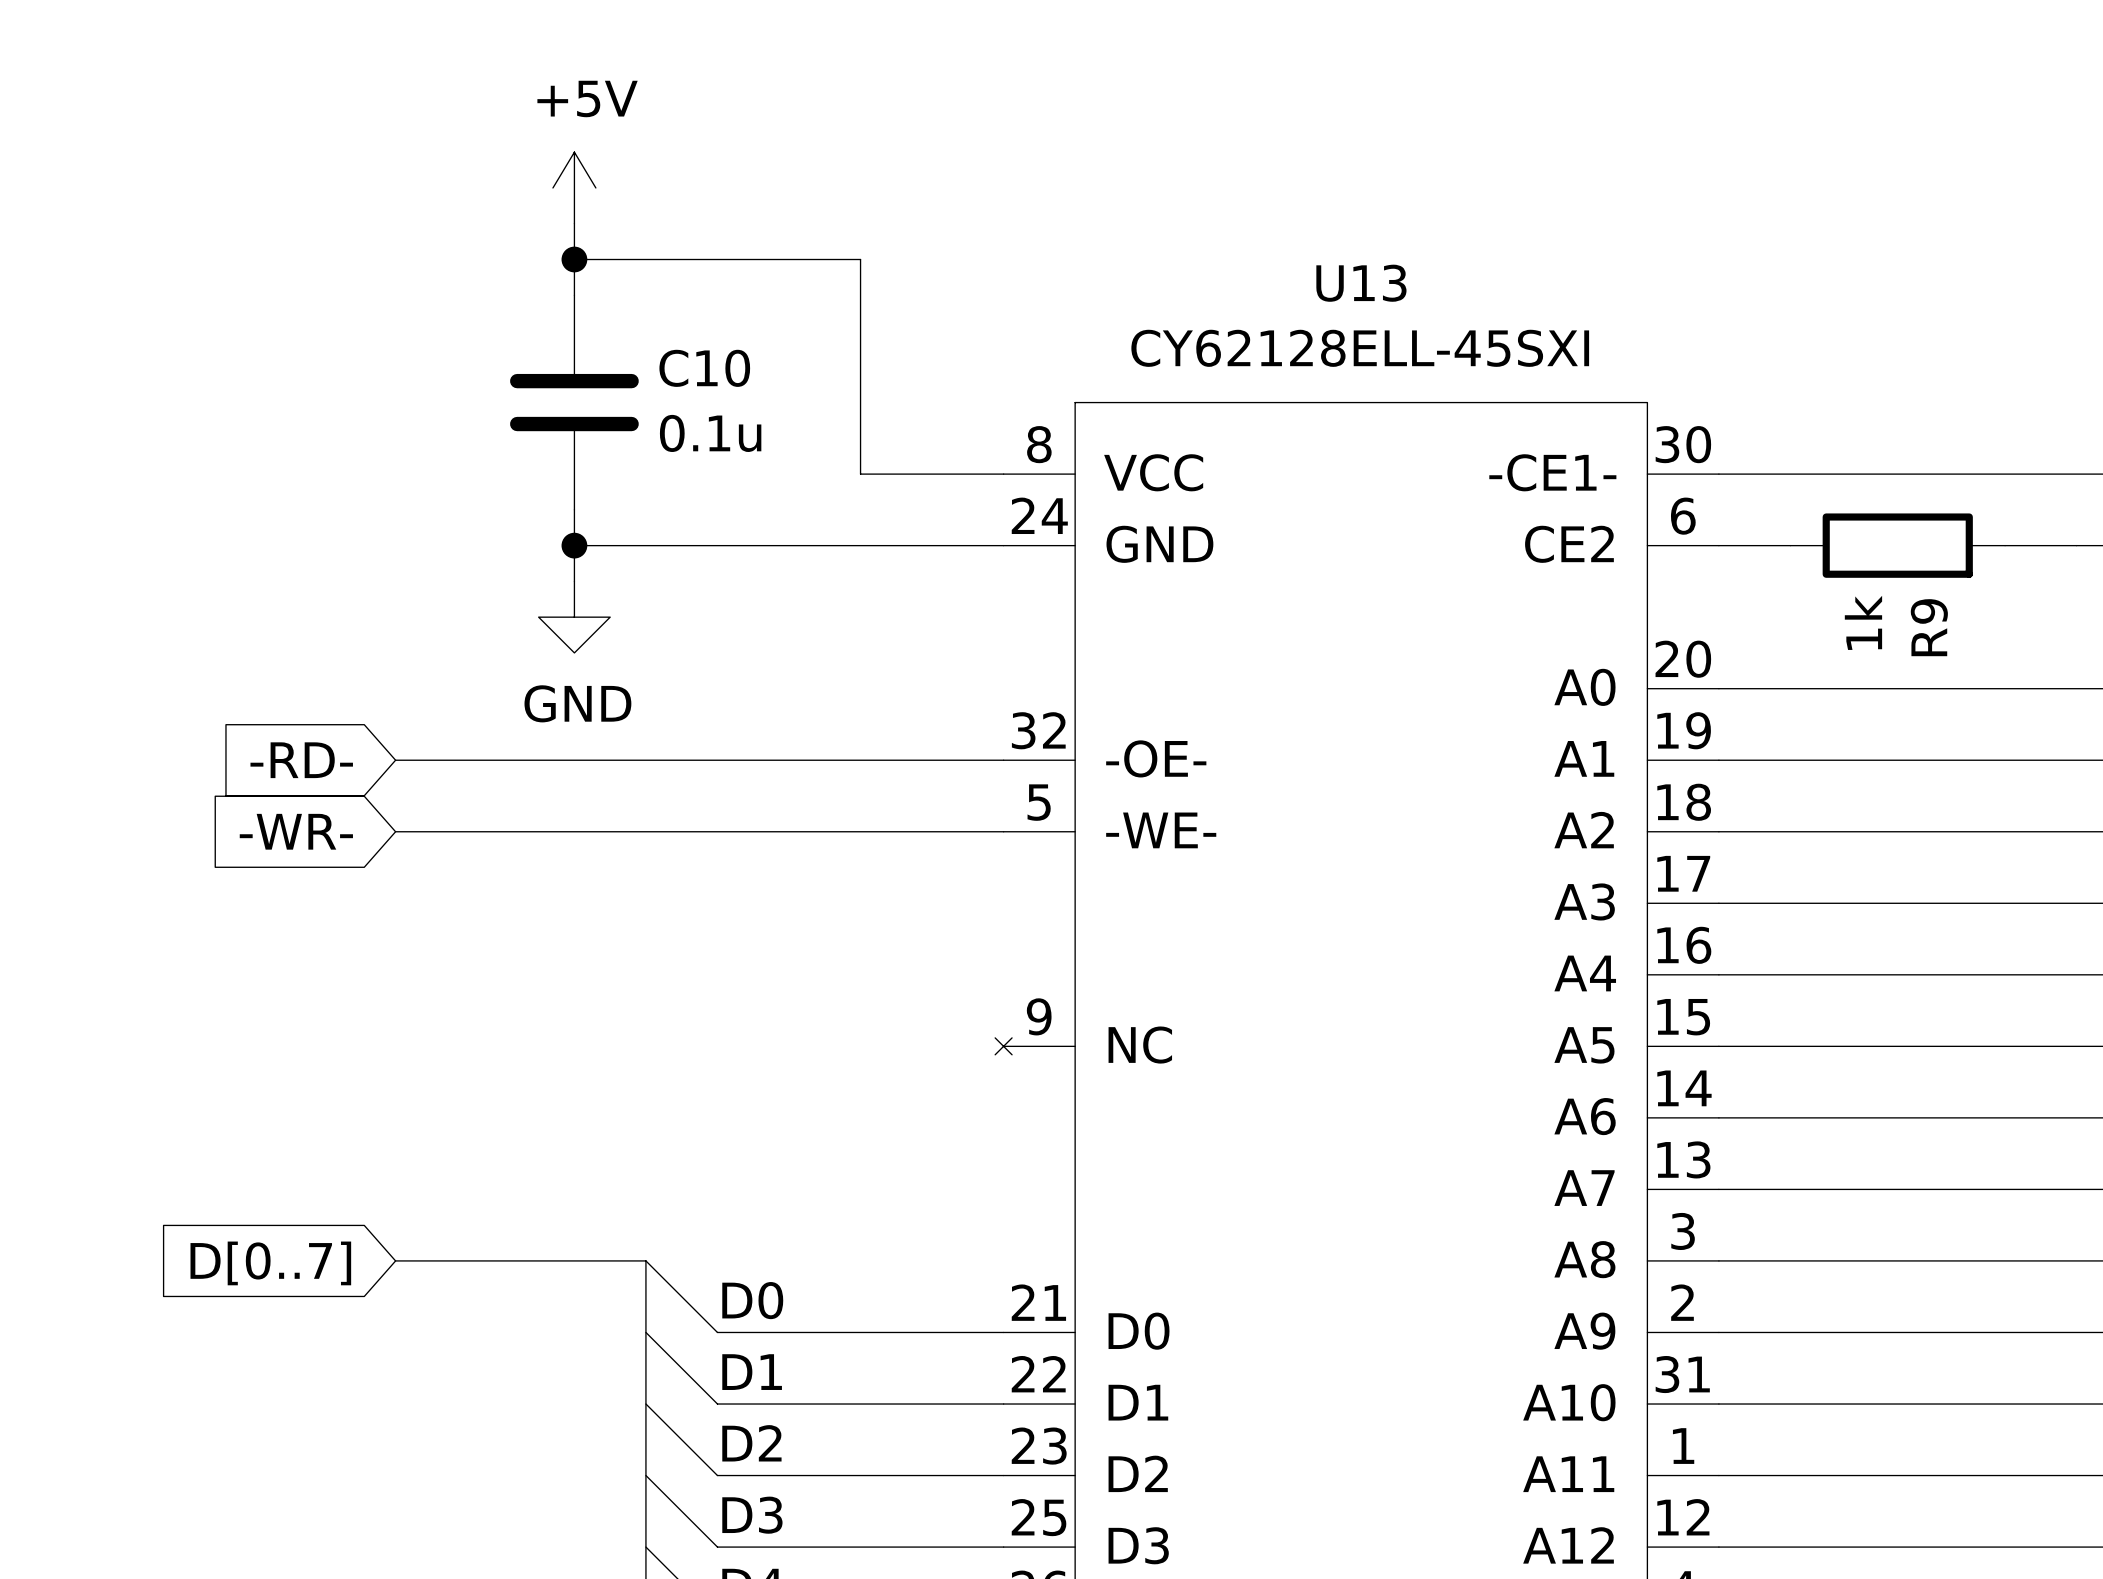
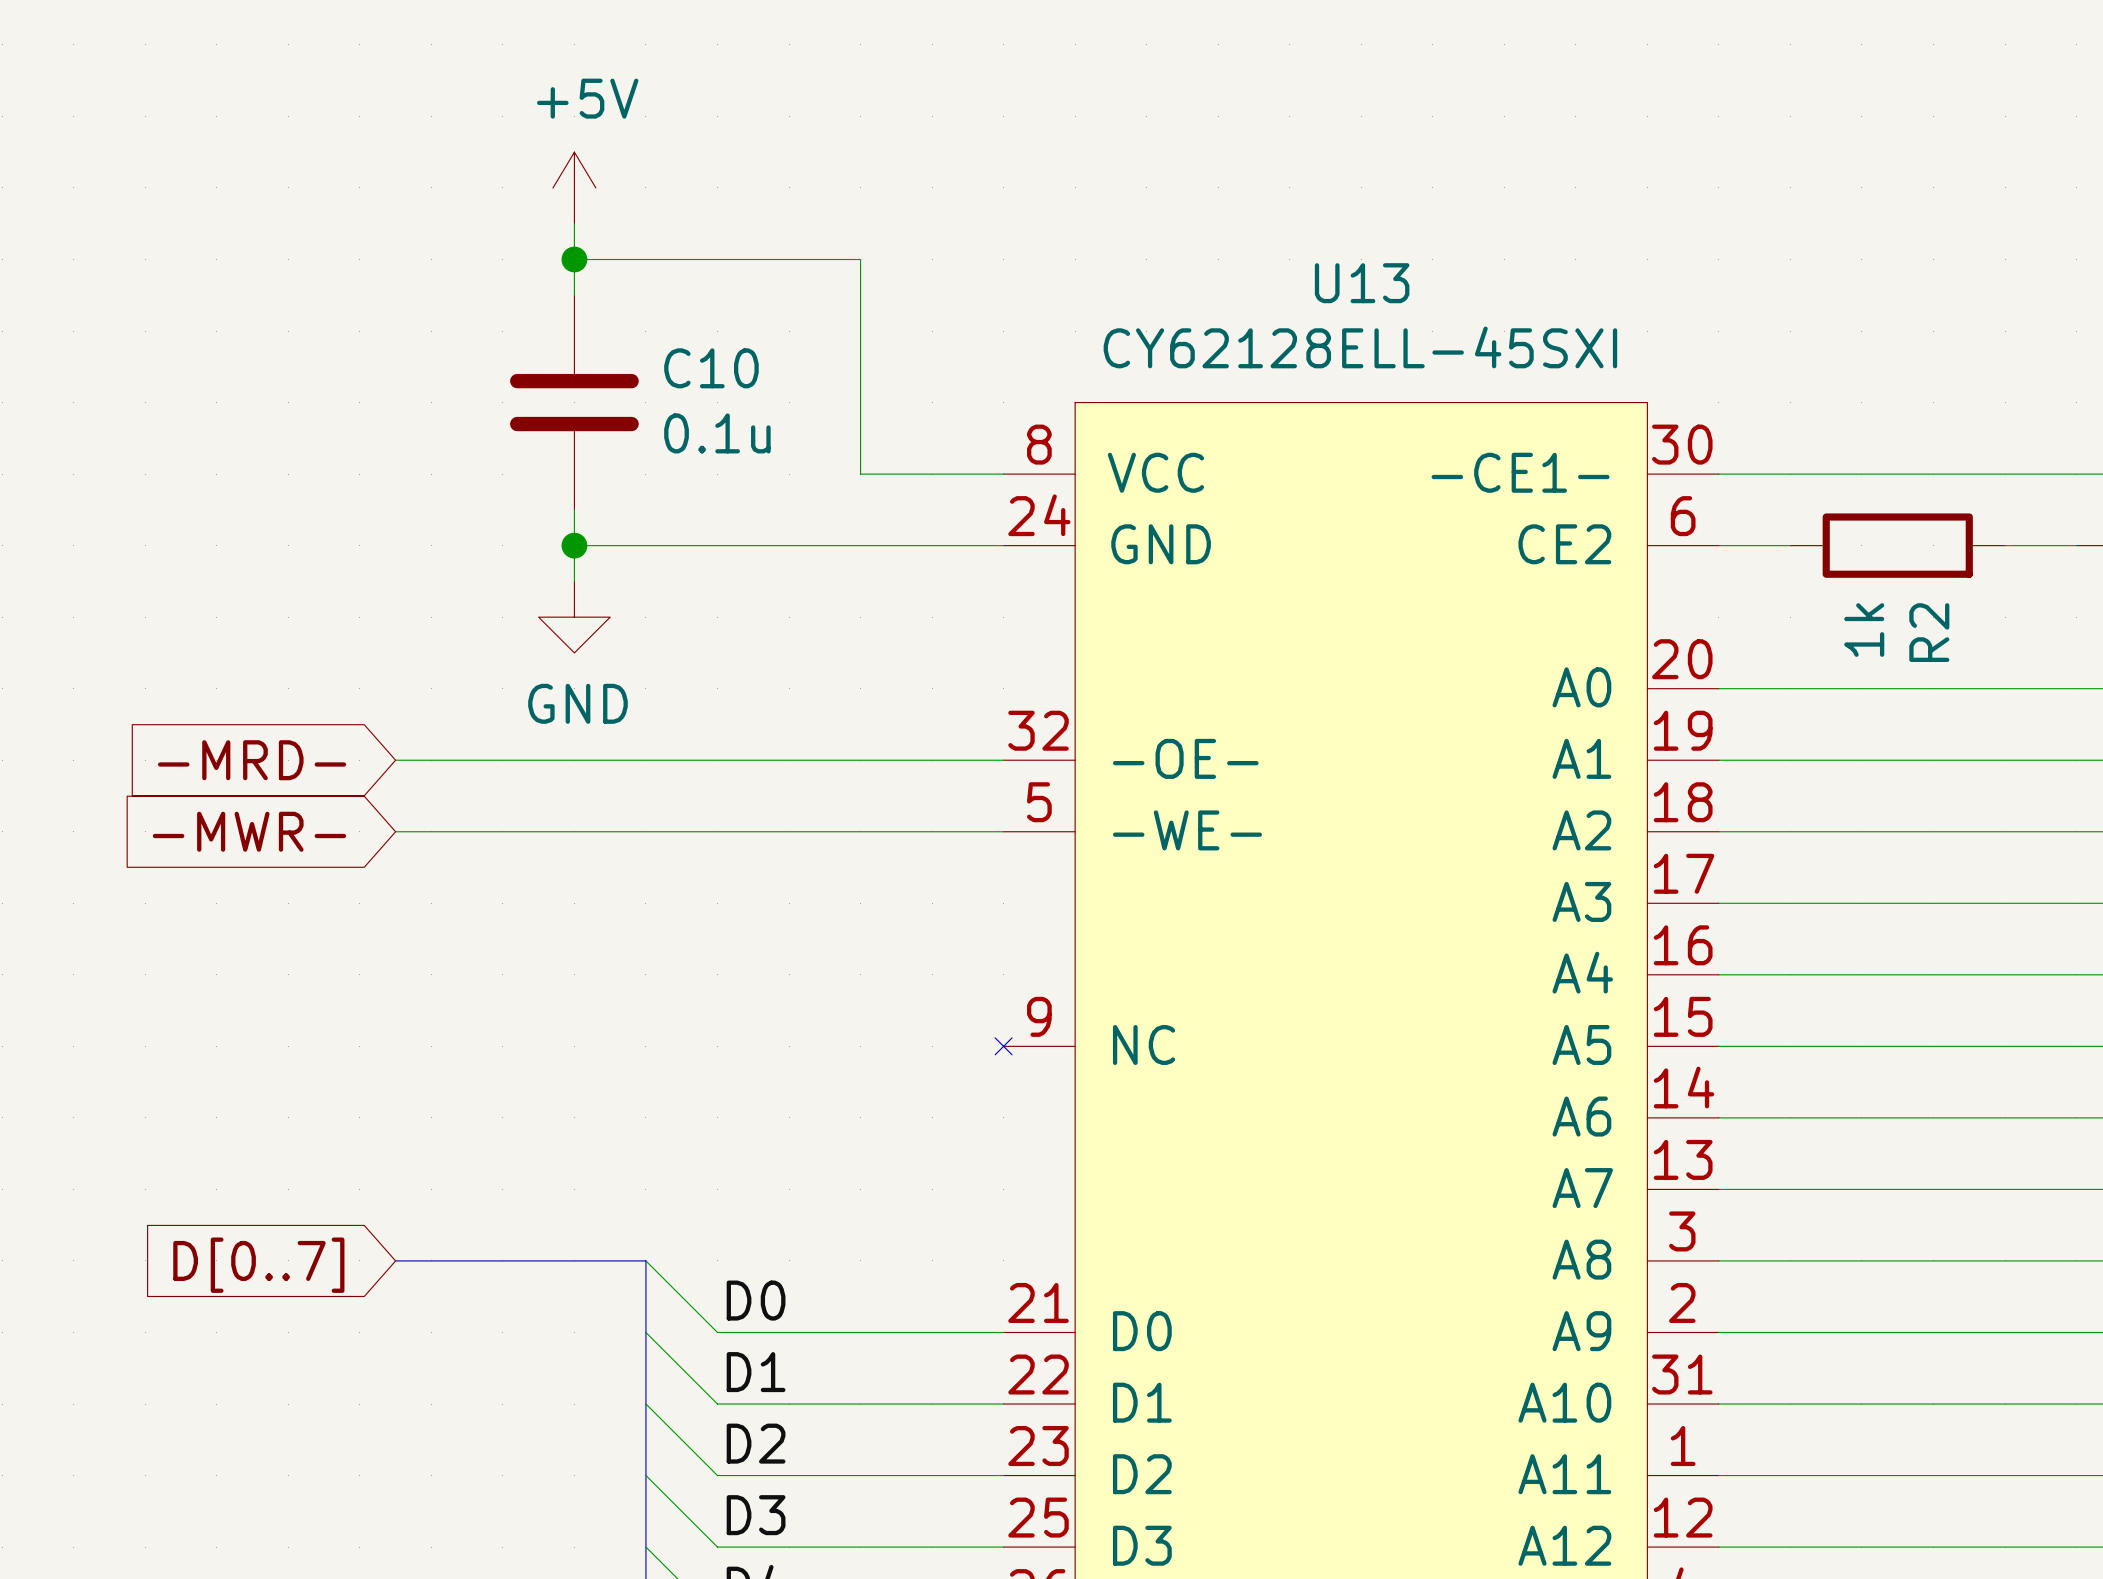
R9 name: R9 (1929, 627) -> R2 (1929, 632)
global label: -RD- (301, 760) -> -MRD- (252, 760)
global label: -WR- (296, 831) -> -MWR- (249, 831)

